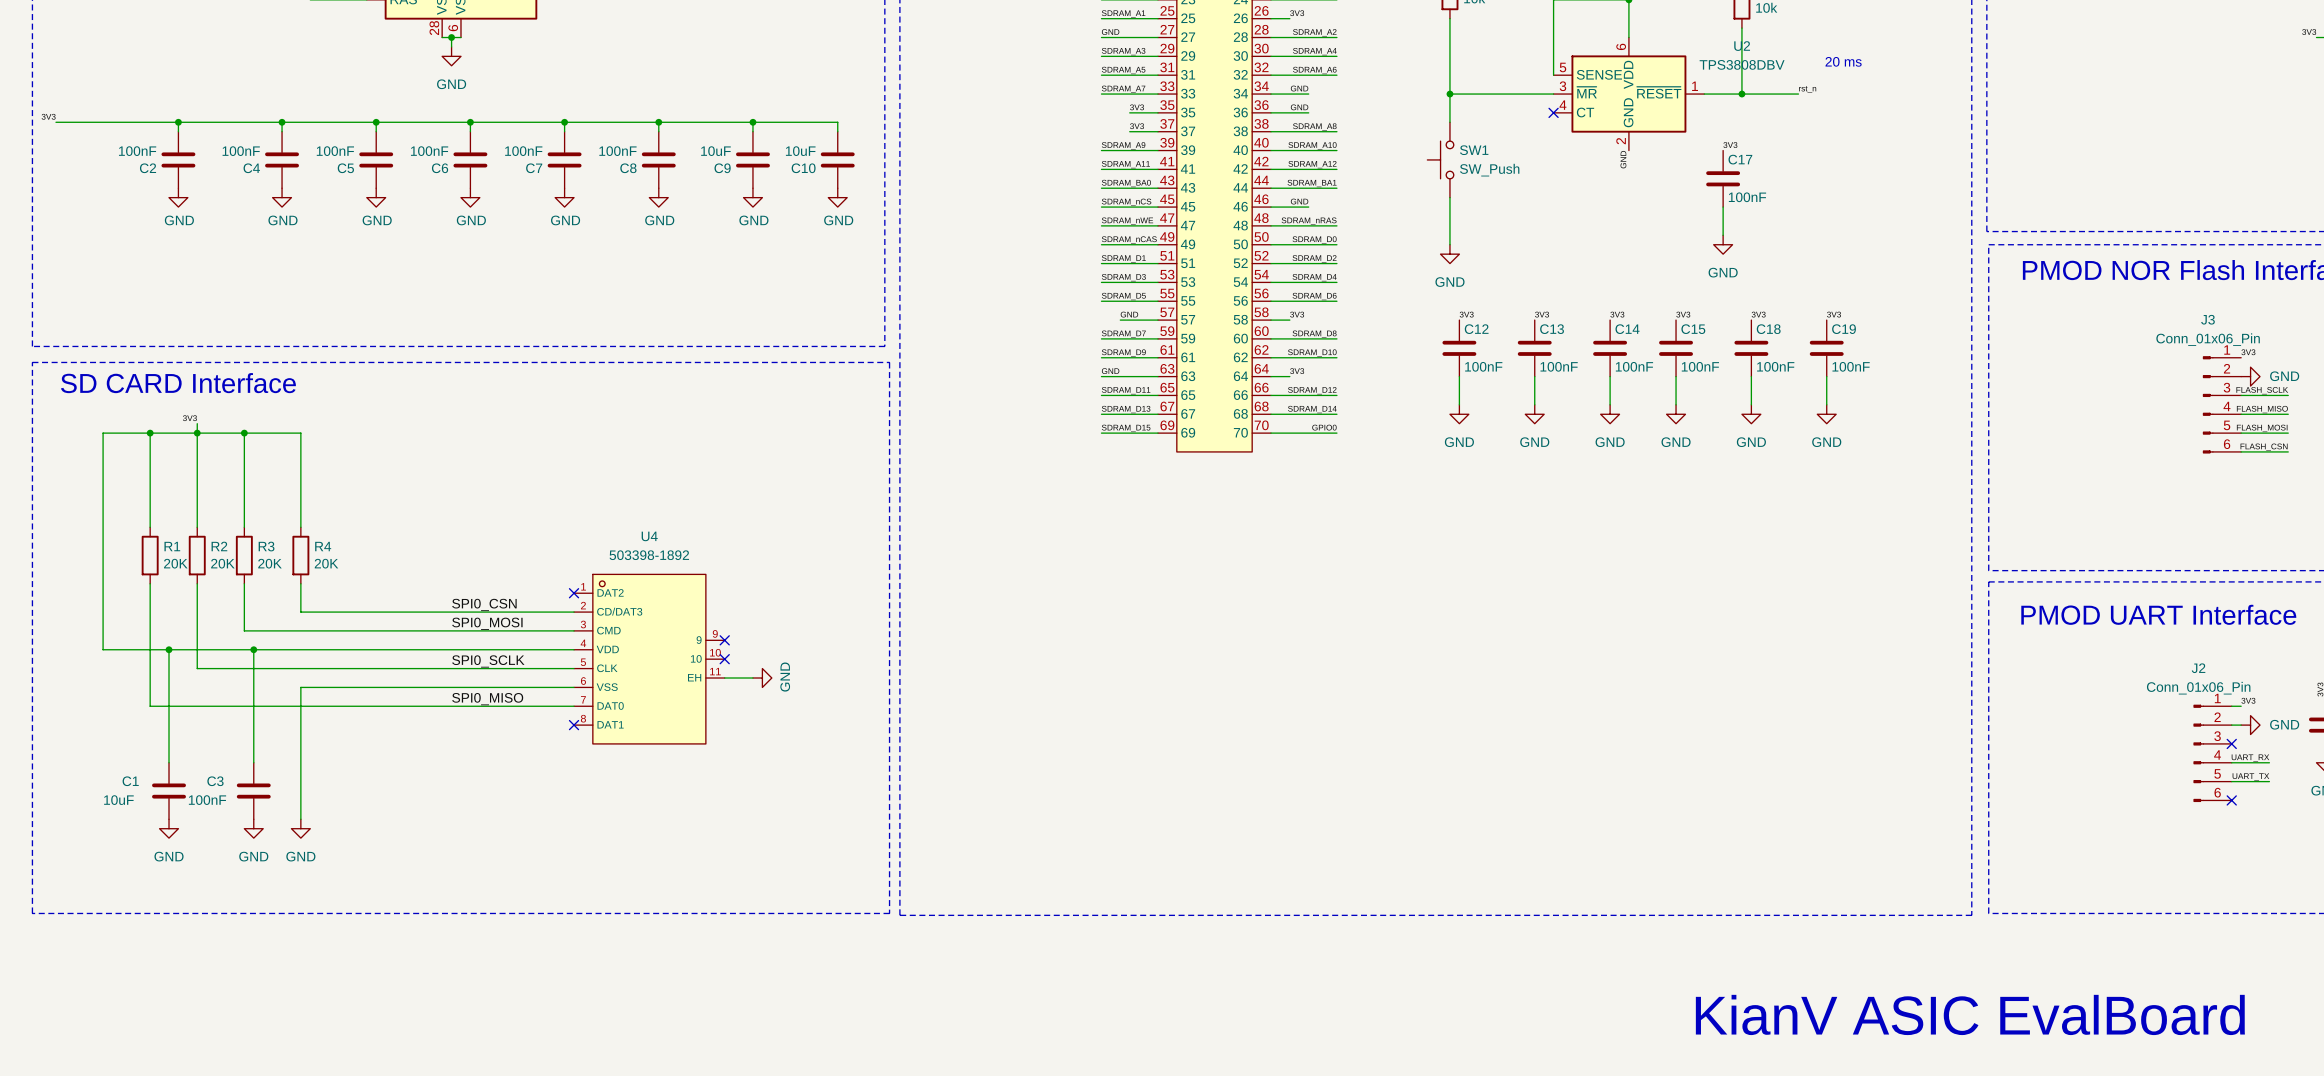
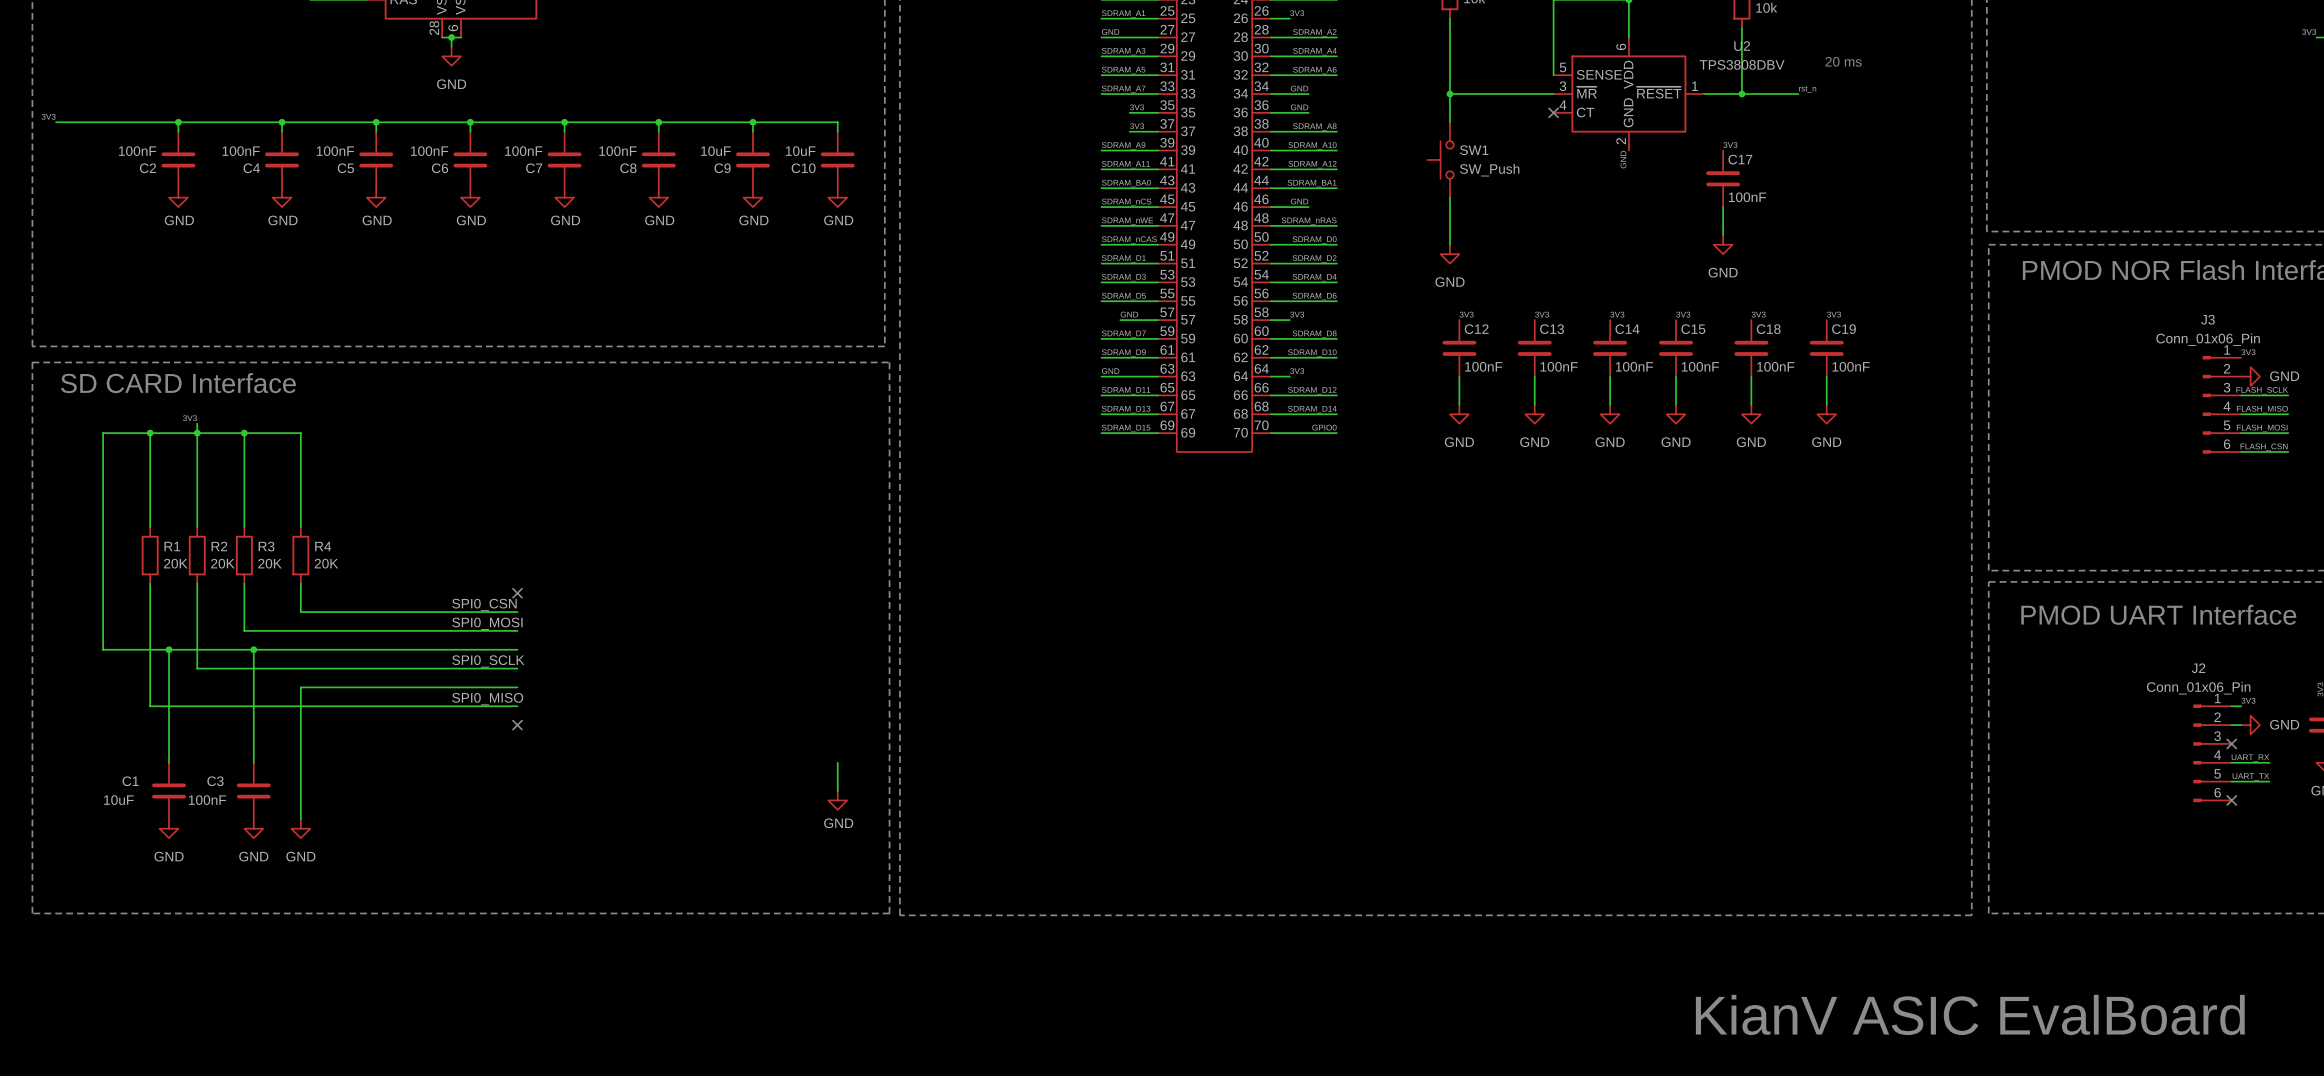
no-connect mark: none -> (517, 593)
no-connect mark: (574, 593) -> none
wire: (517, 612) (574, 612) -> none
wire: (517, 630) (574, 630) -> none
no-connect mark: (724, 640) -> none
wire: (517, 649) (574, 649) -> none
U4: 503398-1892 (649, 659) -> none
no-connect mark: (724, 659) -> none
wire: (517, 668) (574, 668) -> none
wire: (724, 678) (752, 678) -> none
power symbol rotation: 0° (762, 678) -> 90° clockwise (837, 800)
power symbol position: GND (762, 678) -> GND (837, 800)
wire: (517, 687) (574, 687) -> none
wire: (517, 706) (574, 706) -> none
no-connect mark: none -> (517, 725)
no-connect mark: (574, 725) -> none
wire: none -> (837, 762) (837, 791)

